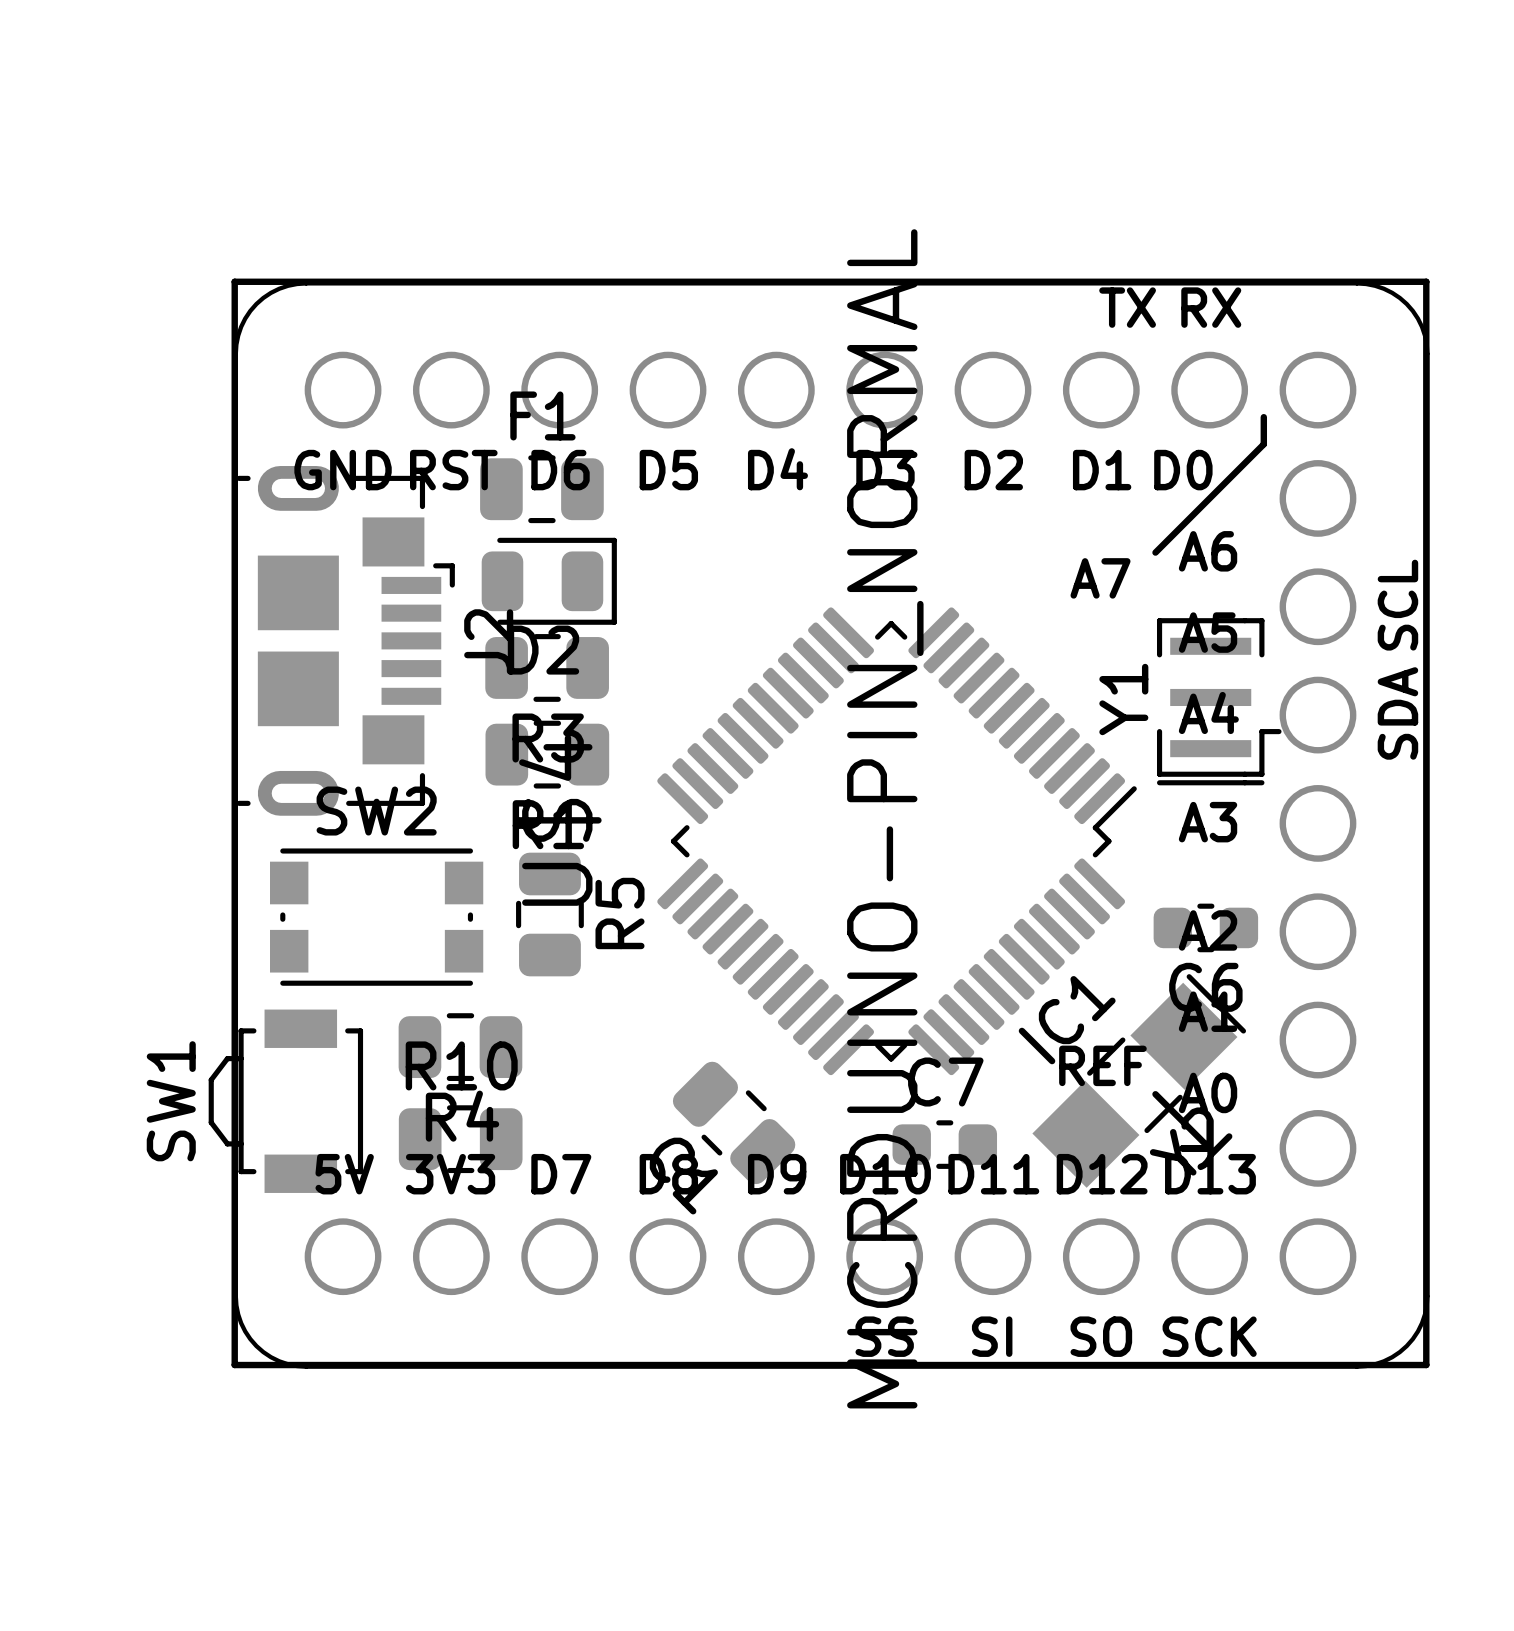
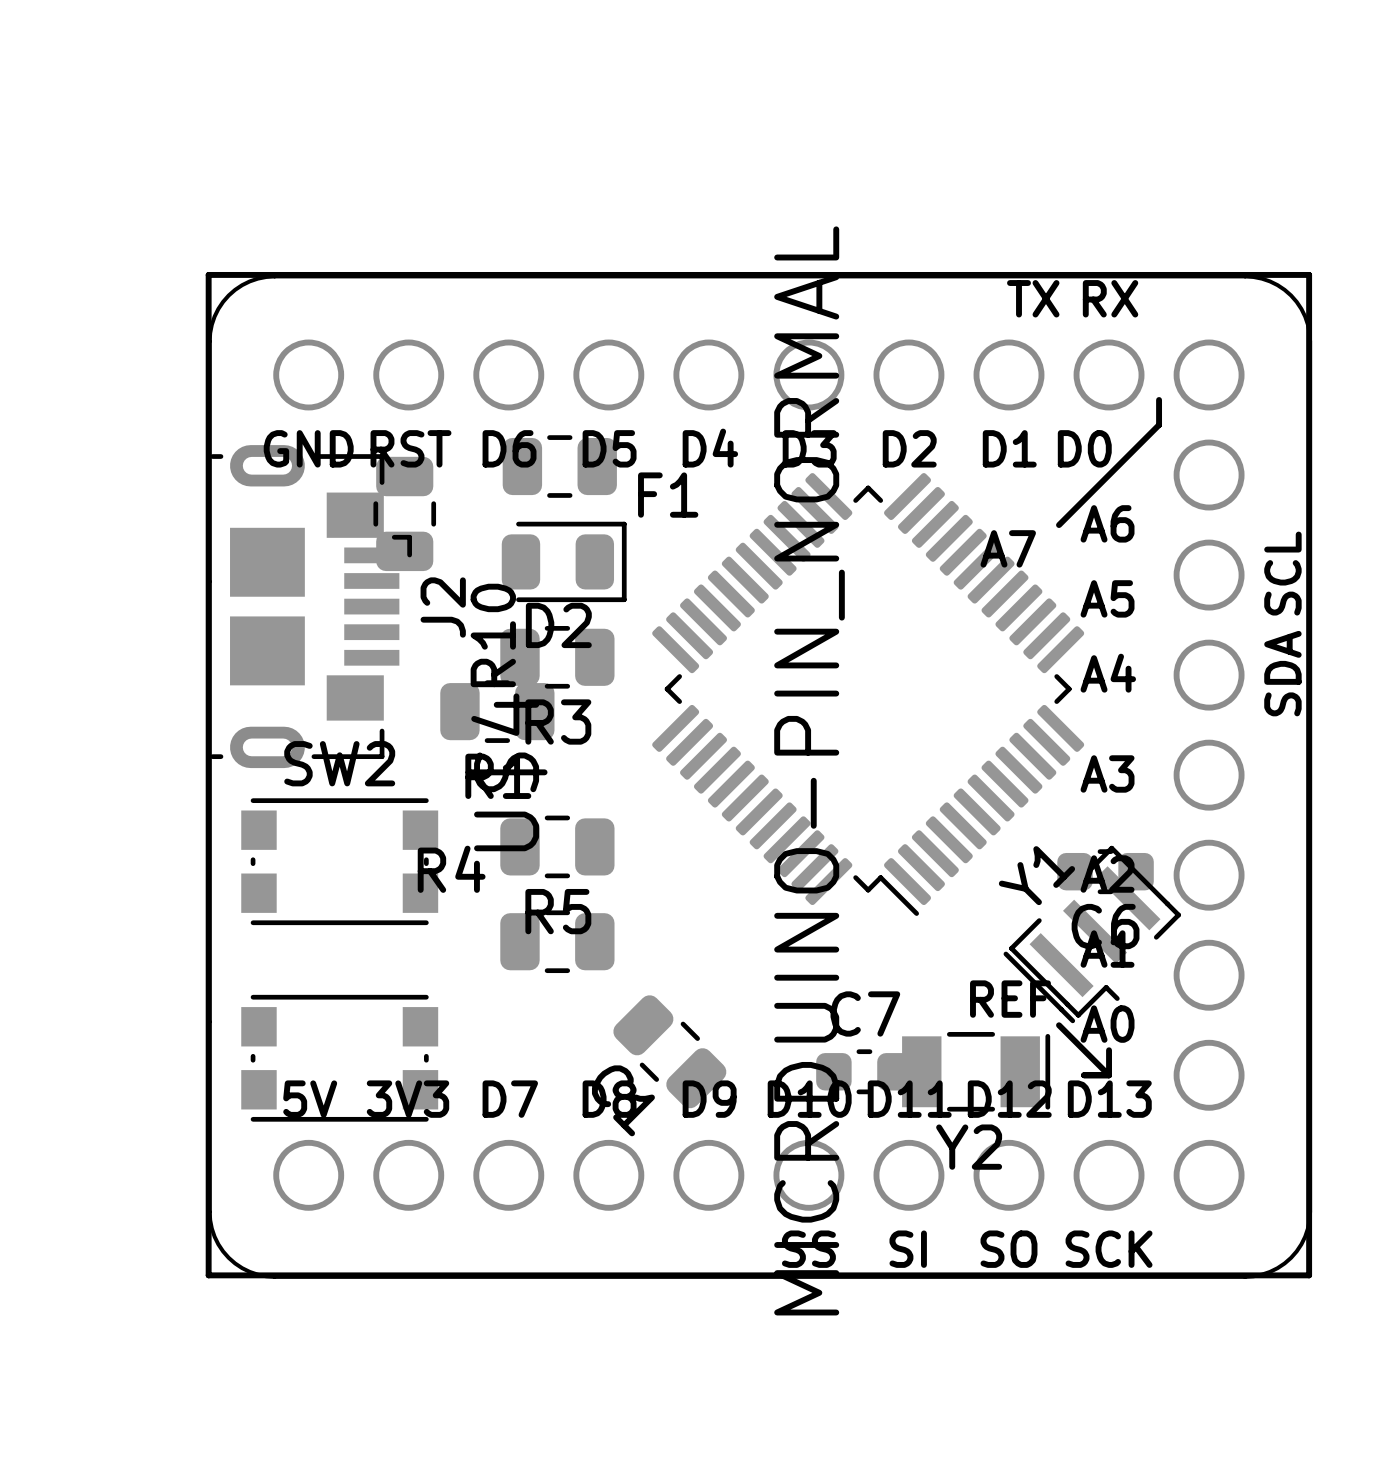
F1 name position: F1 (542, 415) -> F1 (668, 495)
F1 position: (541, 489) -> (559, 466)
D2 position: (549, 581) -> (564, 561)
R3 position: (547, 667) -> (557, 657)
Y1 rotation: 0° (1219, 701) -> 45° clockwise (1092, 934)
Y1 position: (1219, 701) -> (1092, 934)
part: none -> (868, 694)
IC1: (897, 841) -> none
R5 rotation: 0° (549, 914) -> 90° clockwise (557, 846)
Y2 footprint: [1032, 974, 1247, 1188] -> [902, 1032, 1051, 1112]
R4 position: (460, 1047) -> (557, 941)
R10 name position: R10 (461, 1065) -> R10 (493, 635)
SW1: (285, 1101) -> none
R4 name position: R4 (462, 1116) -> R4 (451, 869)
part: none -> (339, 1058)
R10 rotation: 0° (460, 1139) -> 90° clockwise (404, 513)
R10 position: (460, 1139) -> (404, 513)

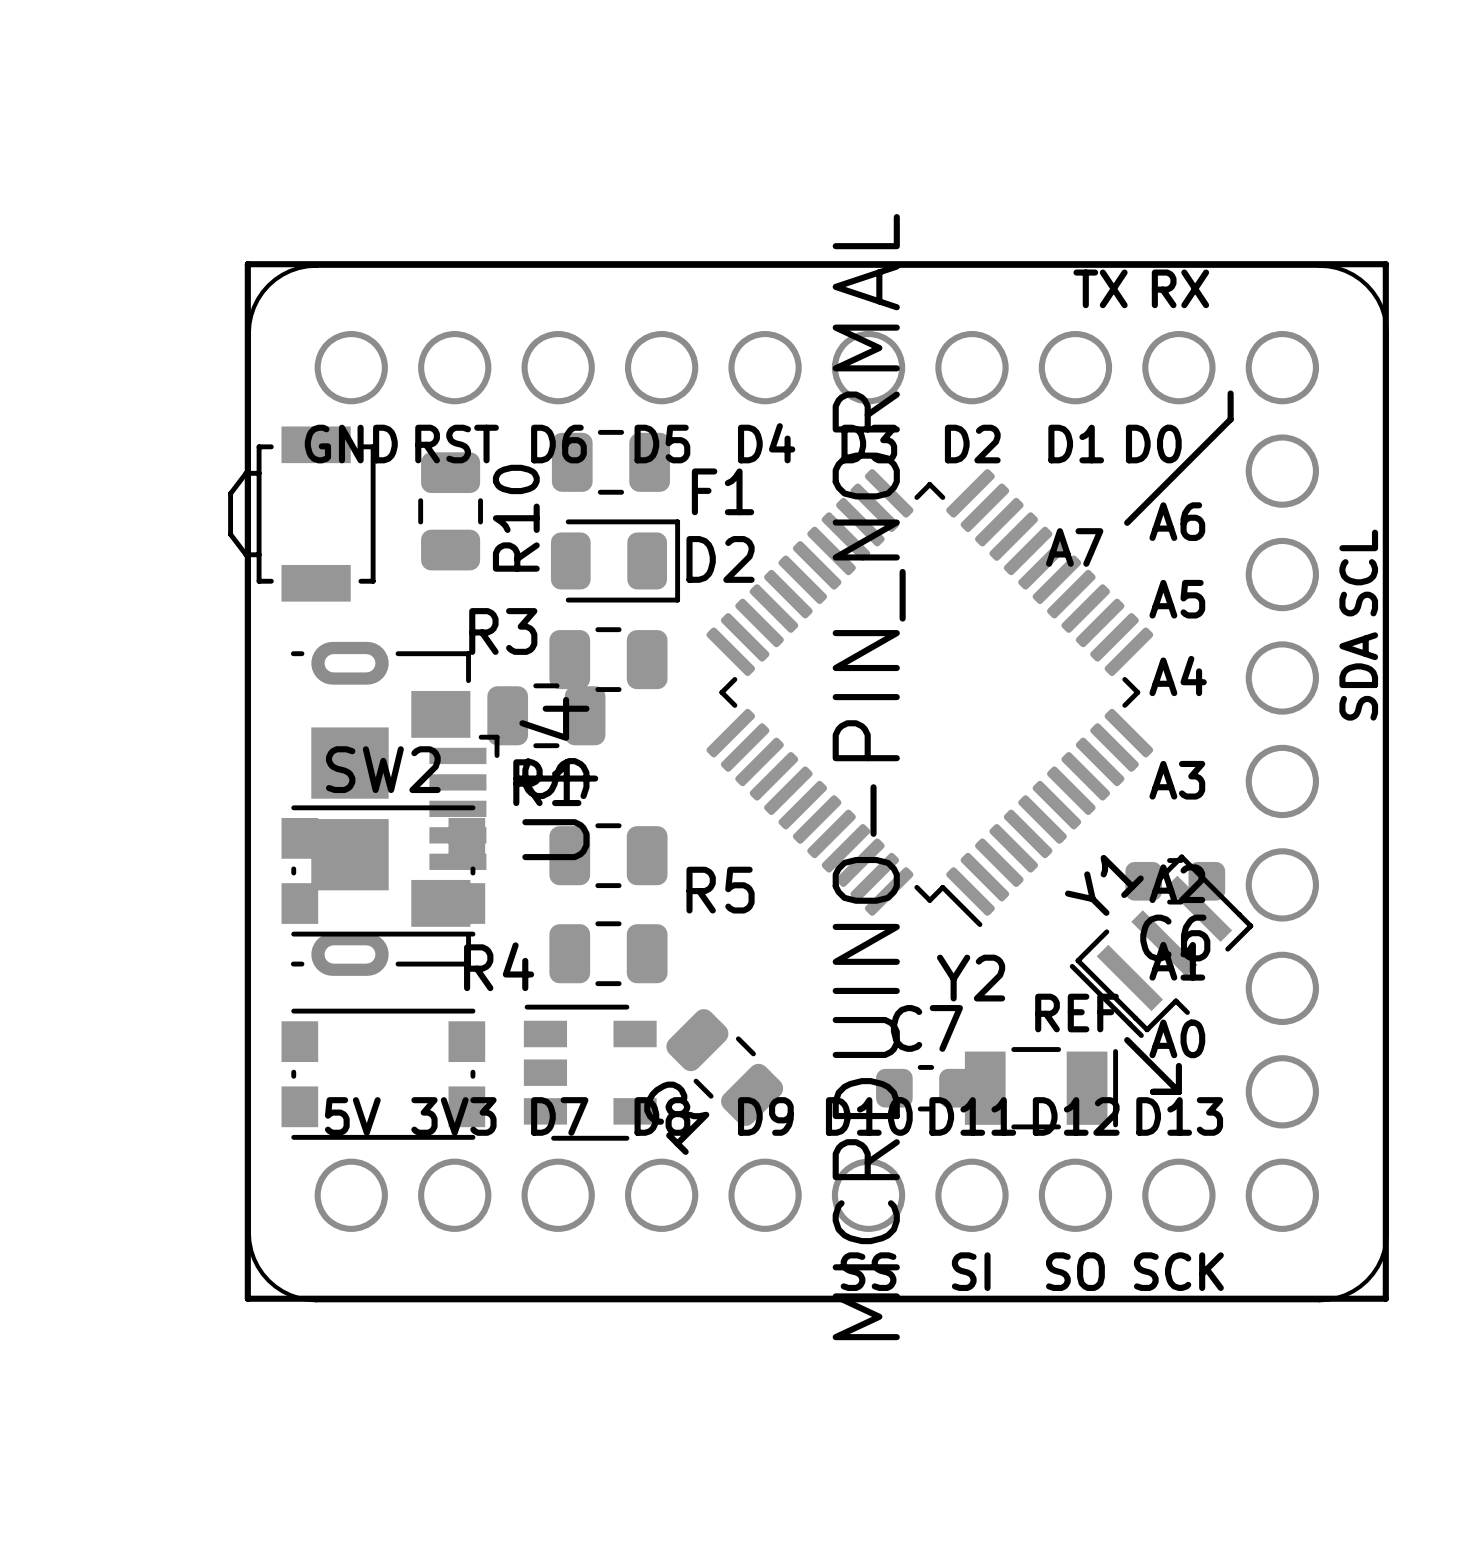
part: none -> (301, 514)
J2: (311, 606) -> none
D2 name position: D2 (558, 625) -> D2 (720, 559)
R10 name position: R10 (493, 635) -> R10 (516, 518)
R3 name position: R3 (558, 722) -> R3 (503, 631)
part: none -> (395, 808)
R4 name position: R4 (451, 869) -> R4 (499, 966)
R5 name position: R5 (558, 911) -> R5 (720, 890)
part: none -> (590, 1072)
Y2 name position: Y2 (969, 1147) -> Y2 (971, 978)

